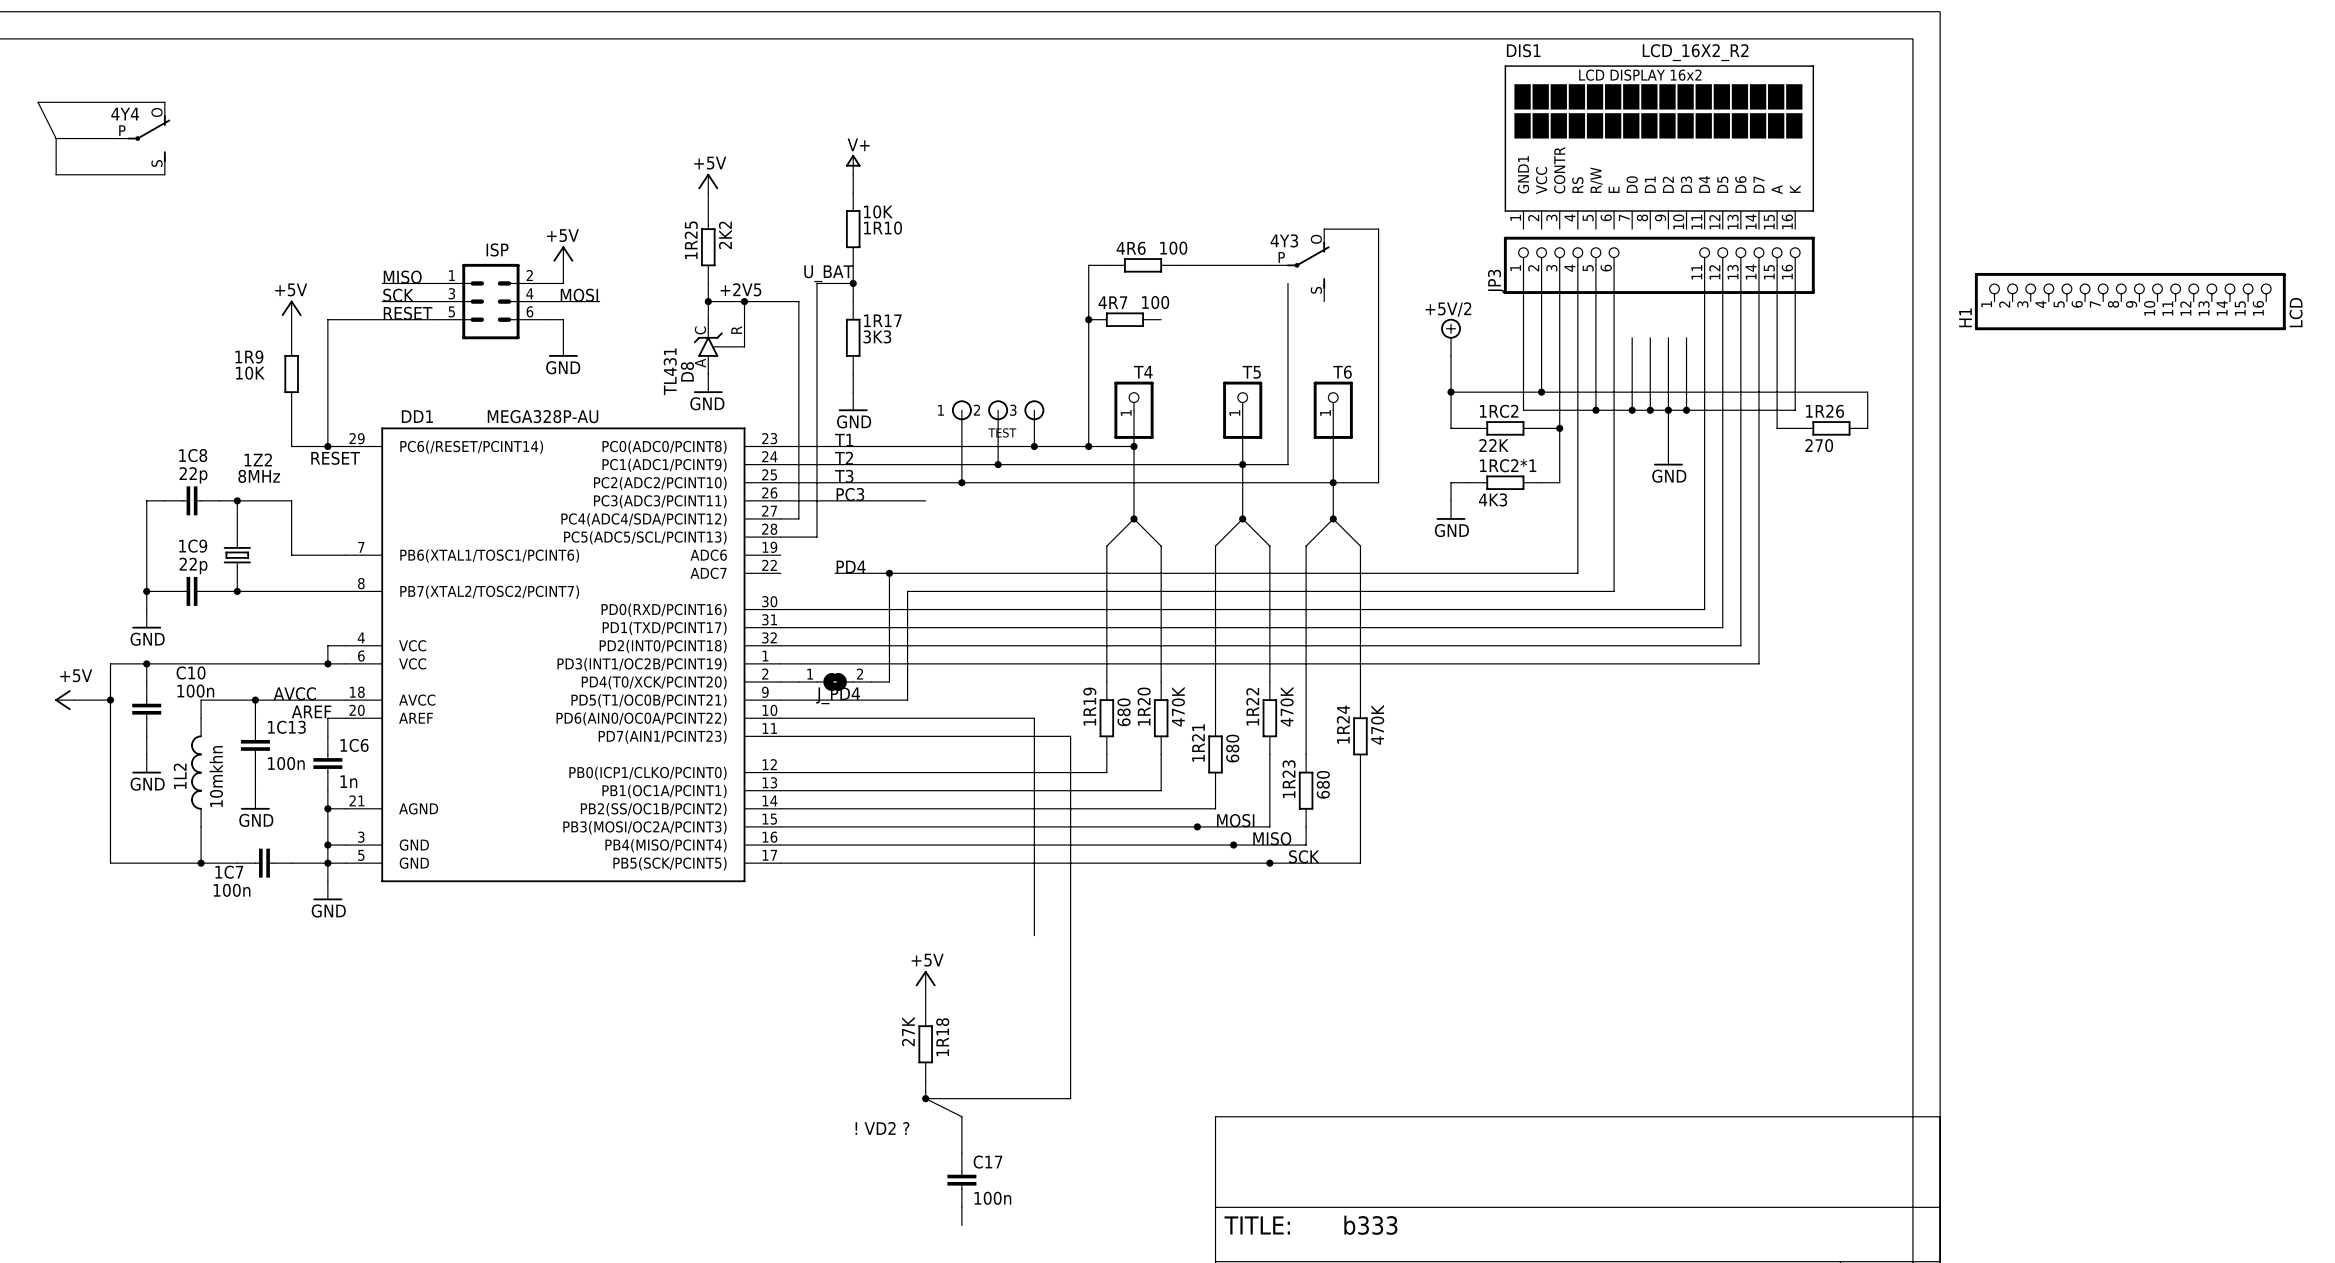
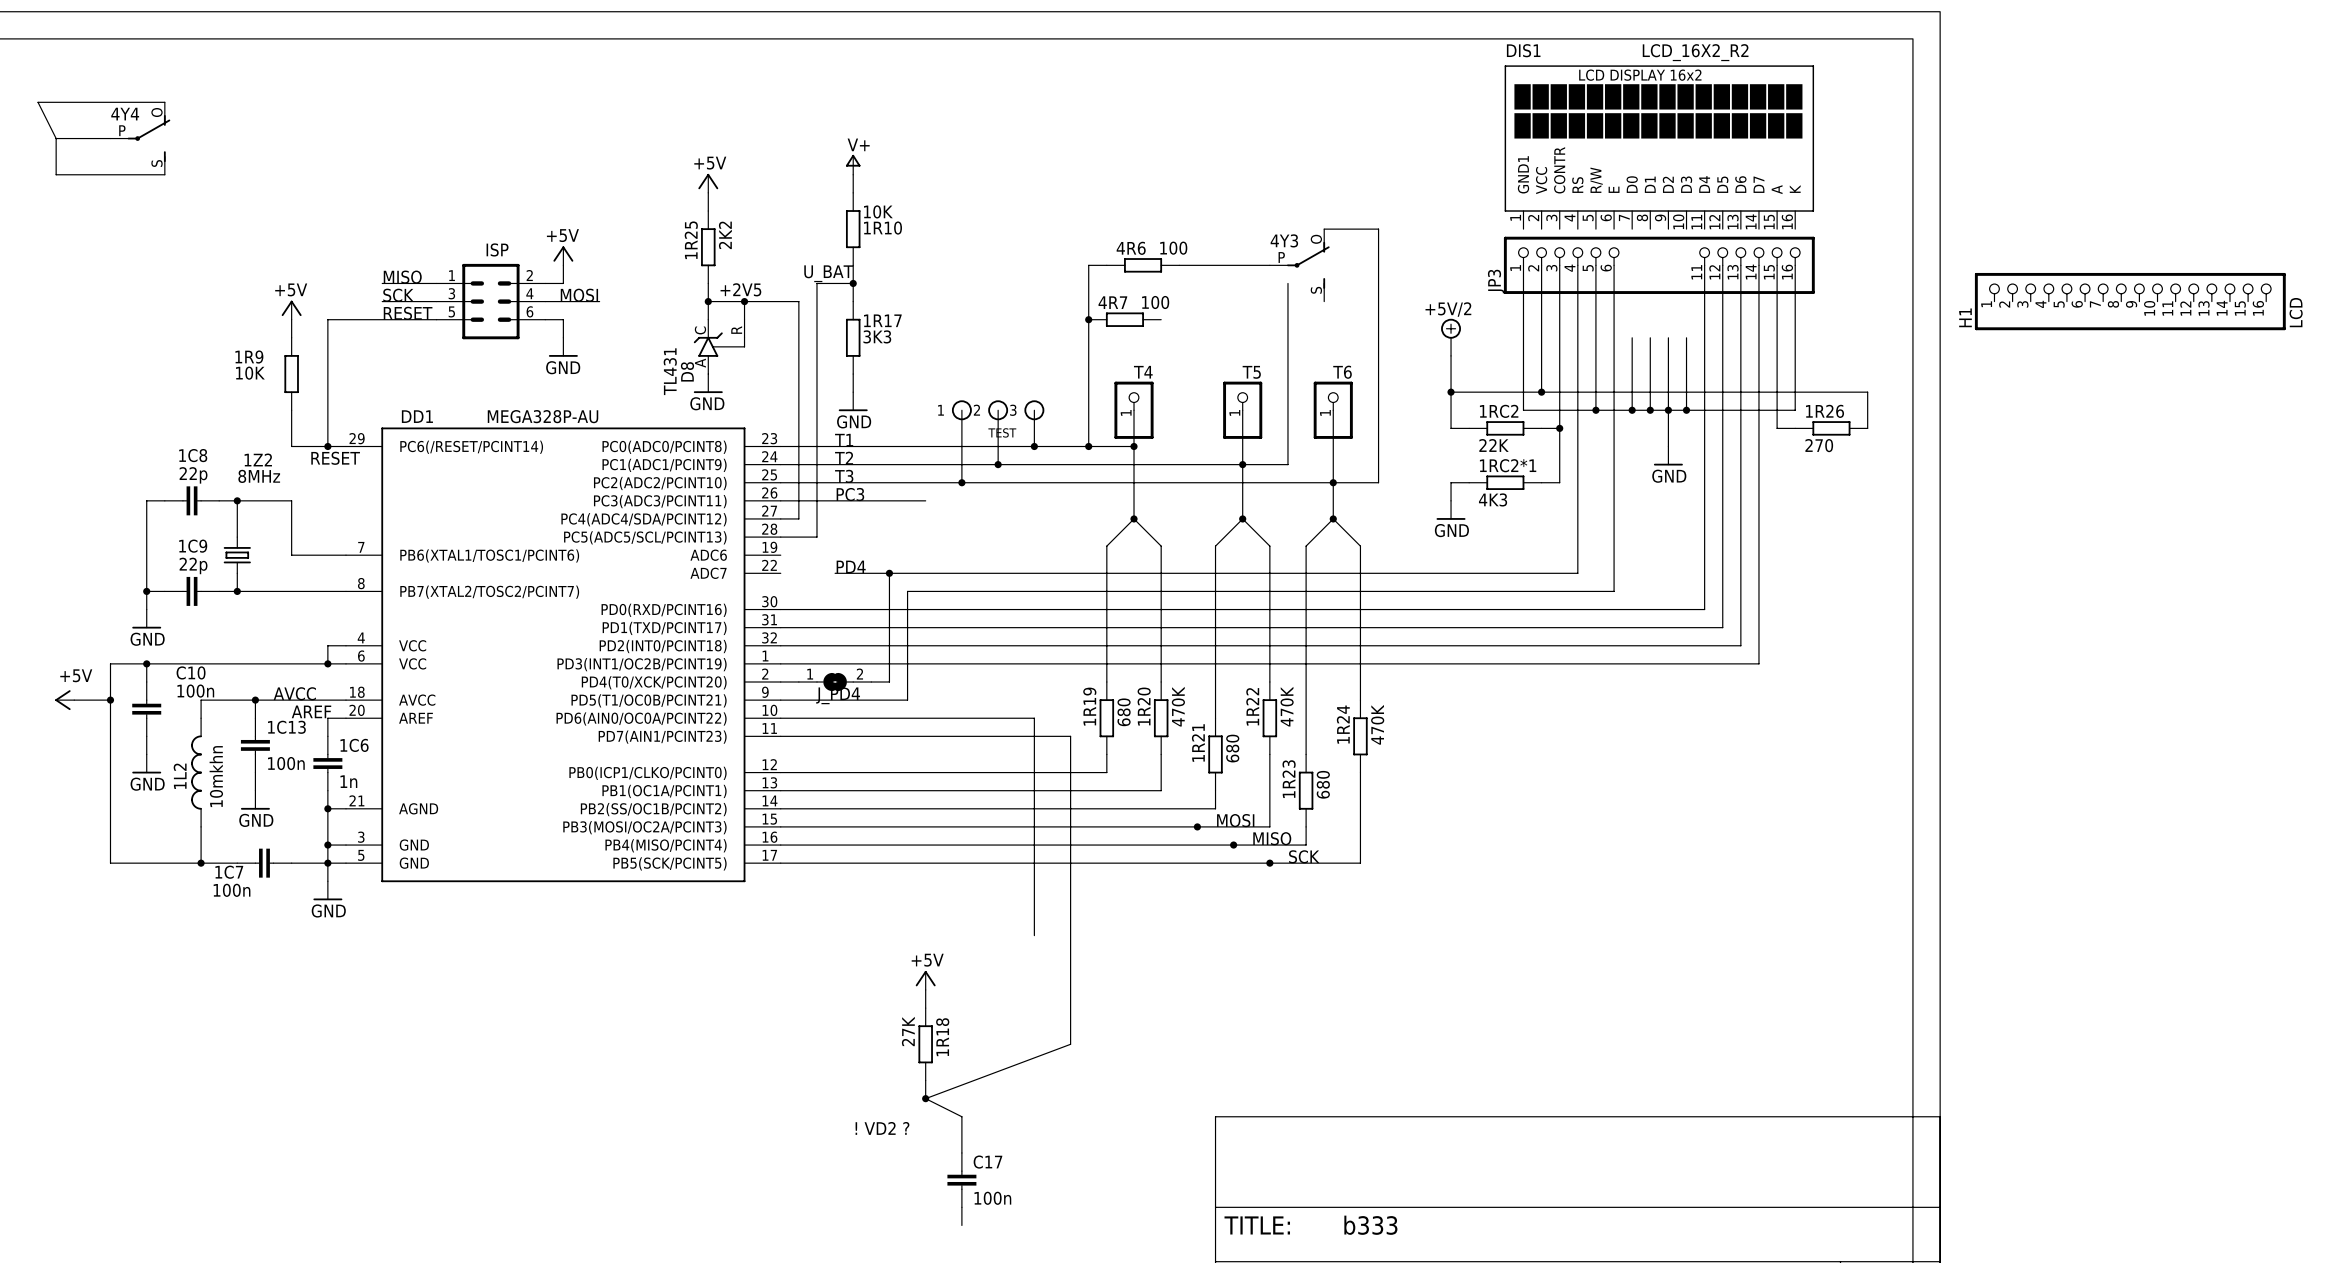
wire: (1070, 1044) (1070, 1098) (925, 1098) -> (1070, 1044) (925, 1098)

